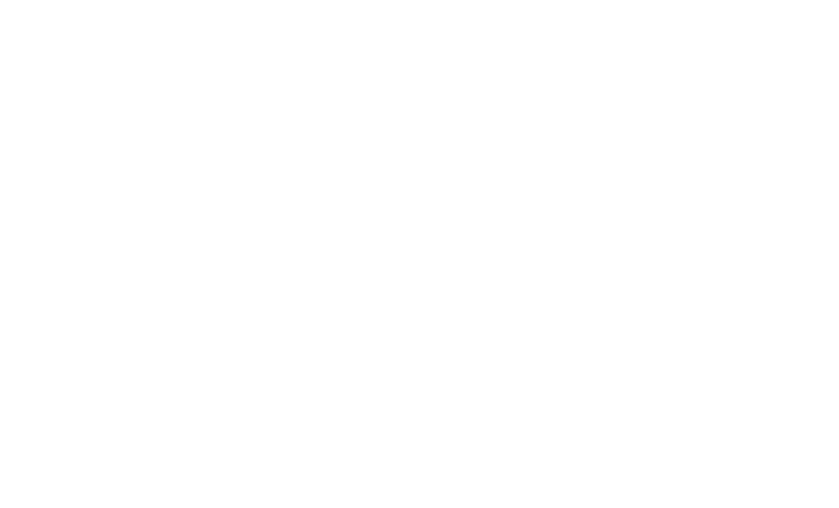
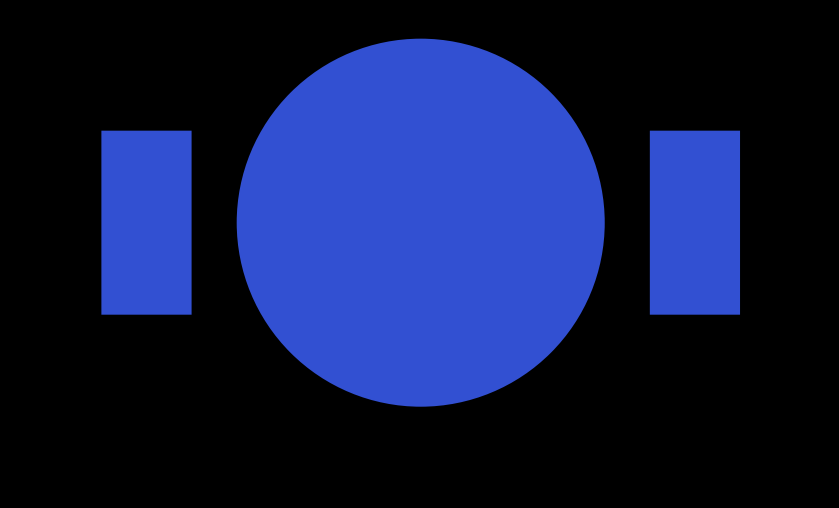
part: none -> (420, 222)

